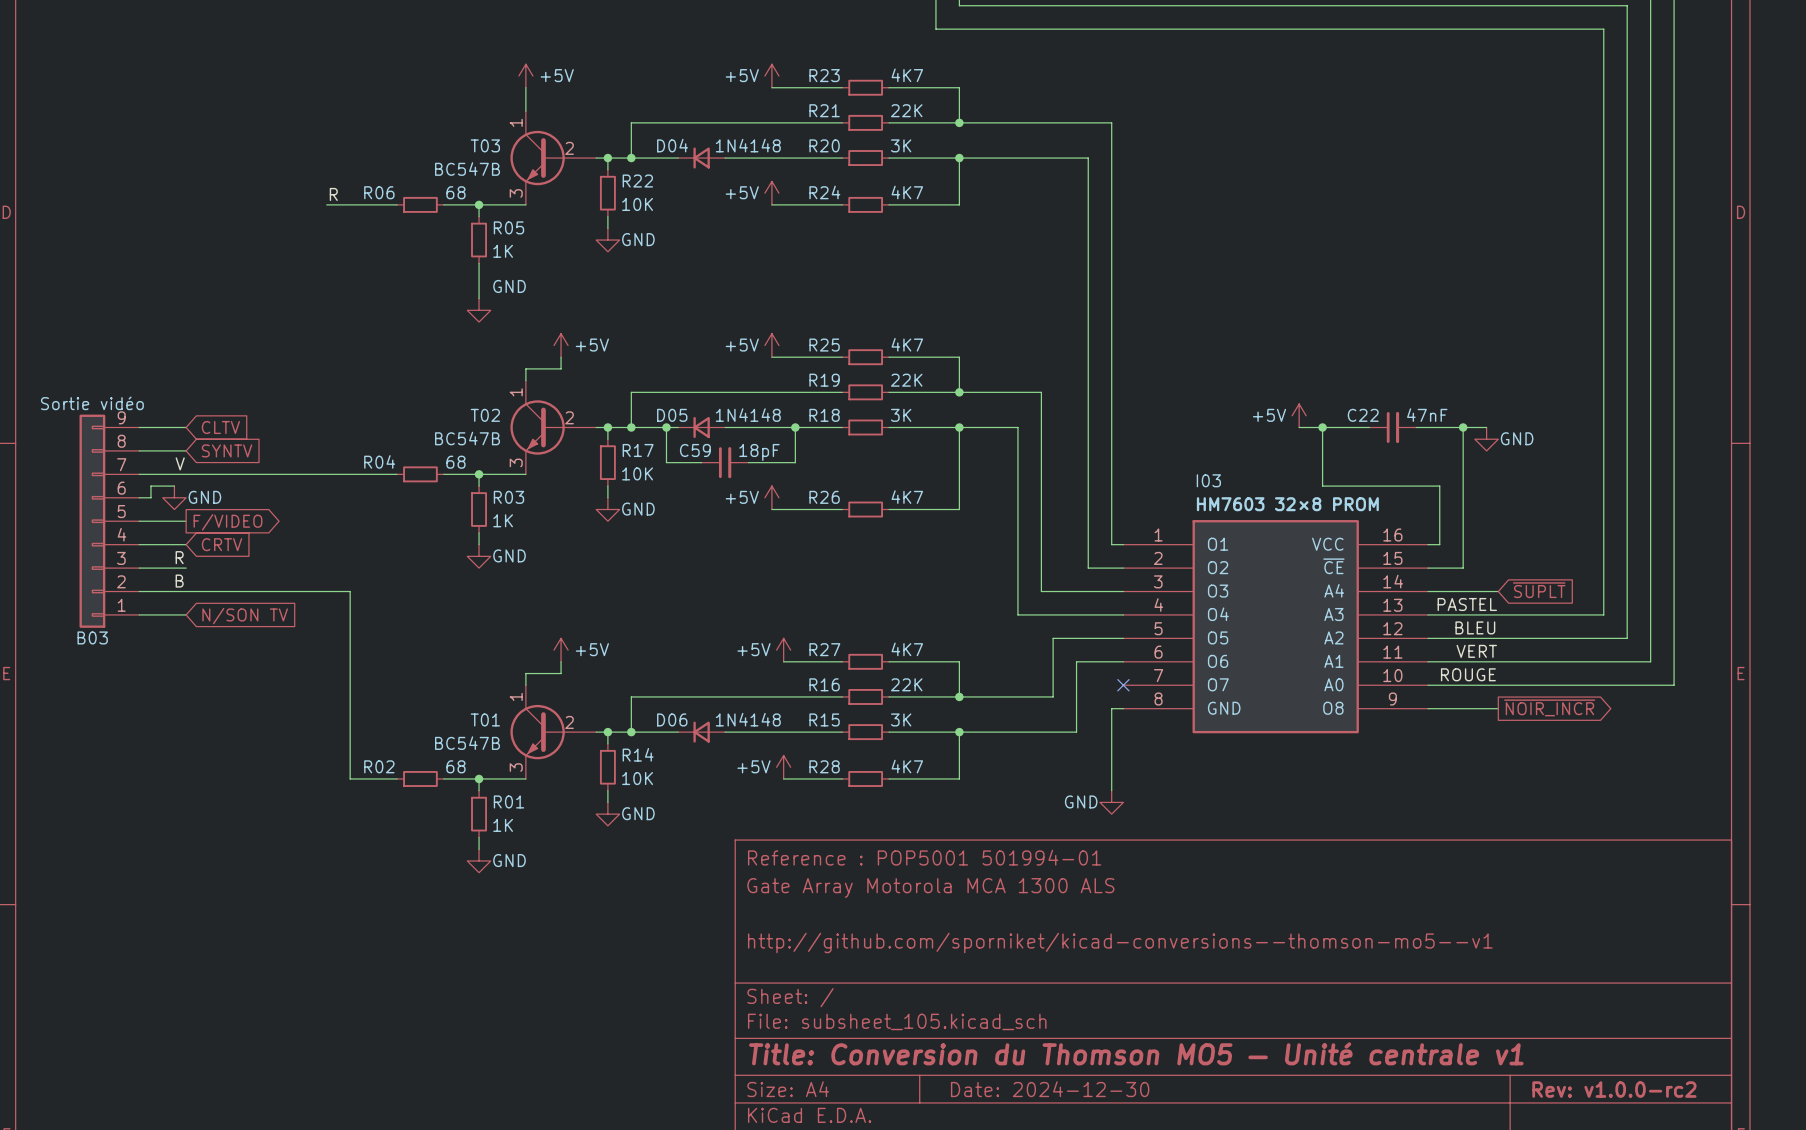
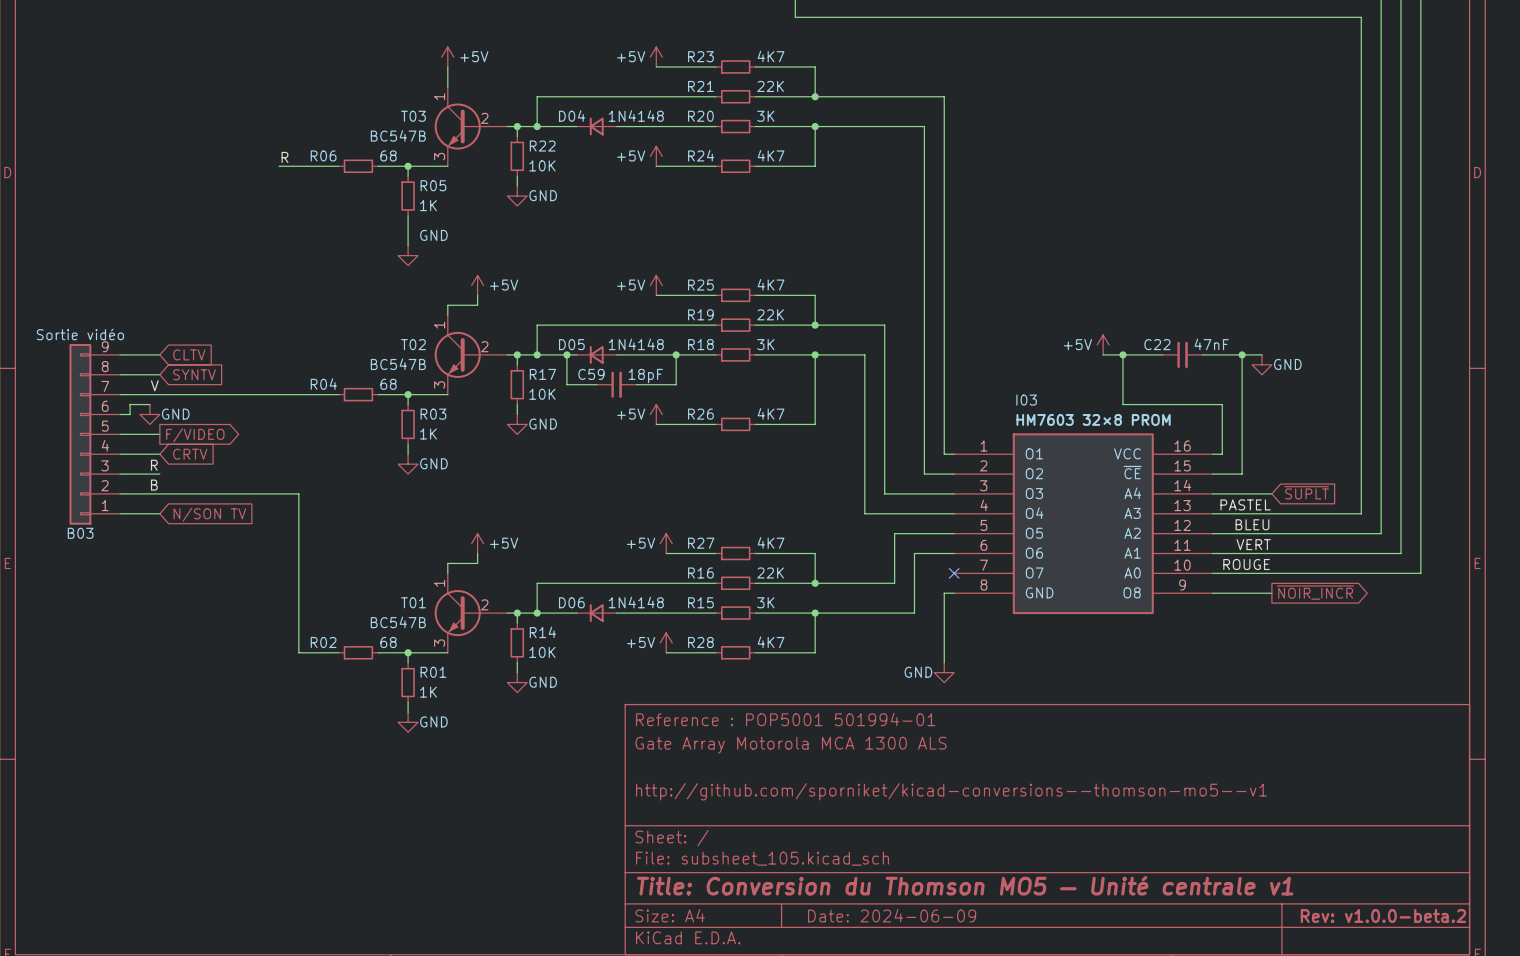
title block: Date: 2024-12-30 (1050, 1089) -> Date: 2024-06-09 (892, 915)
title block: Rev: v1.0.0-rc2 (1614, 1089) -> Rev: v1.0.0-beta.2 (1383, 915)

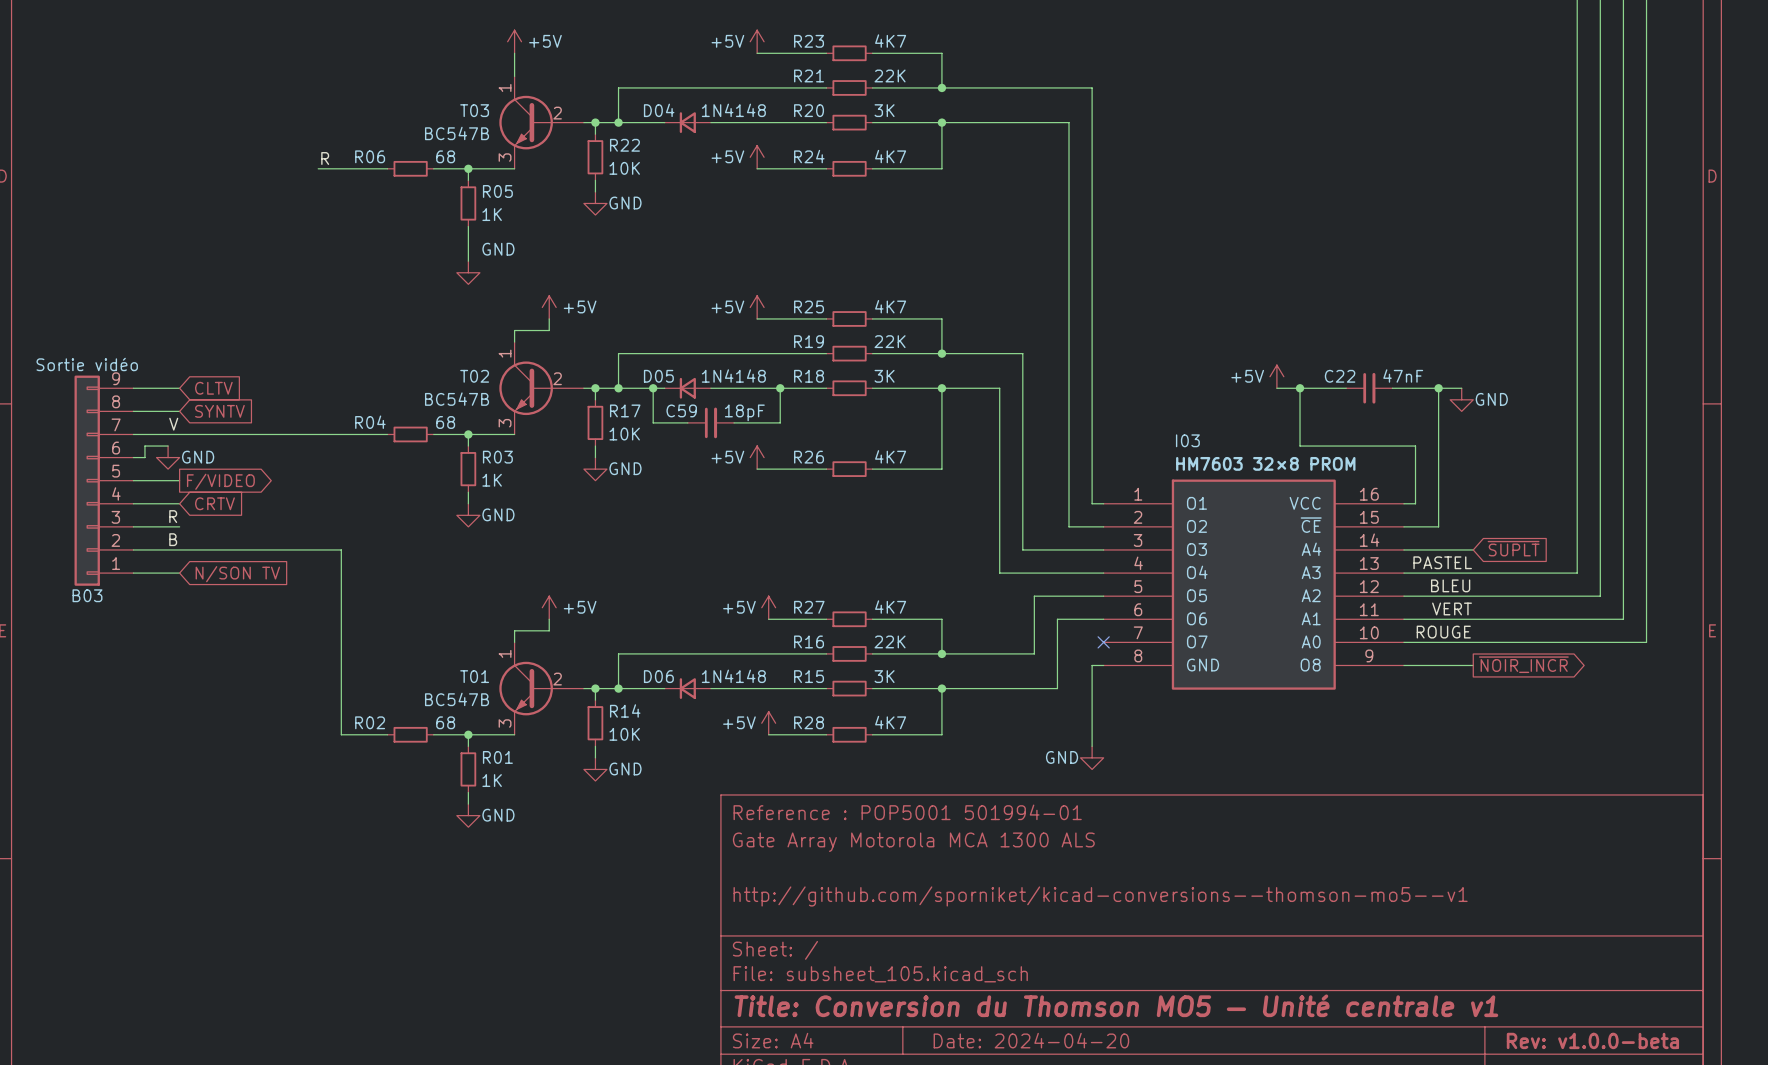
title block: Date: 2024-06-09 (892, 915) -> Date: 2024-04-20 (1031, 1040)
title block: Rev: v1.0.0-beta.2 (1383, 915) -> Rev: v1.0.0-beta (1592, 1040)

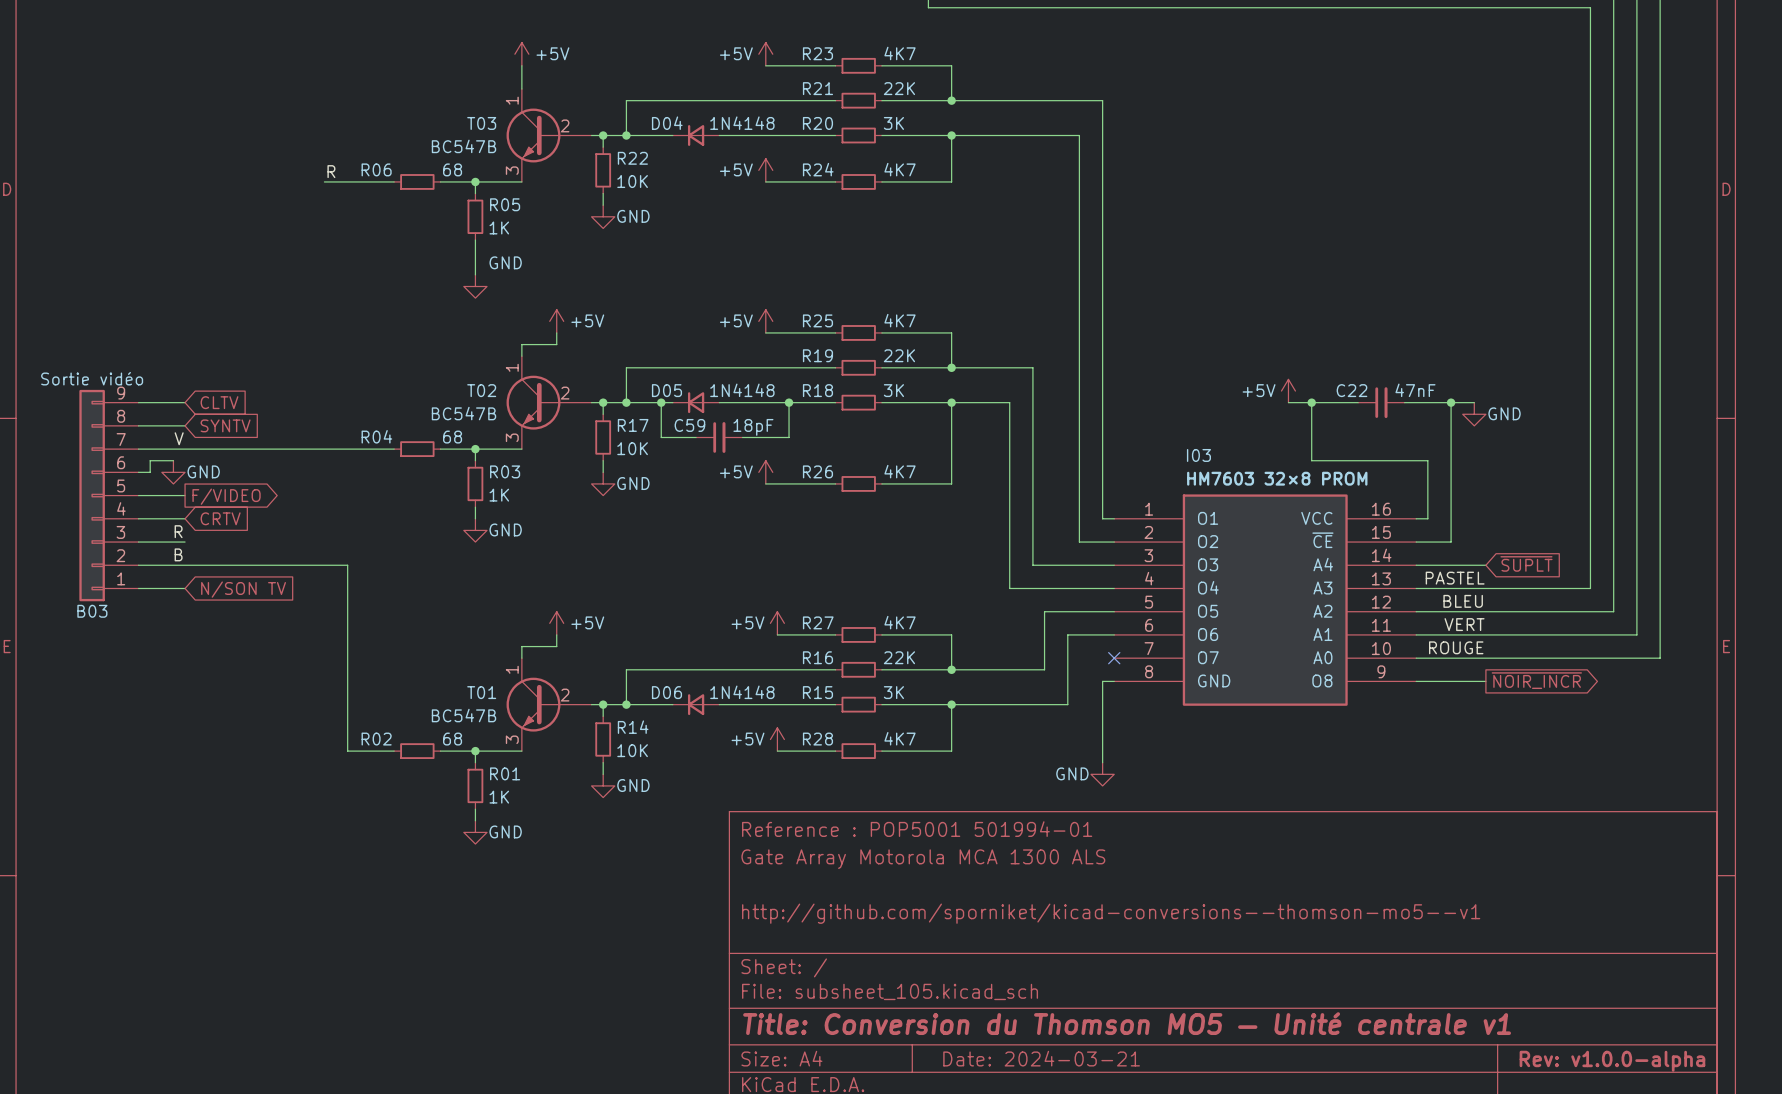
title block: Date: 2024-04-20 (1031, 1040) -> Date: 2024-03-21 (1041, 1058)
title block: Rev: v1.0.0-beta (1592, 1040) -> Rev: v1.0.0-alpha (1612, 1061)

